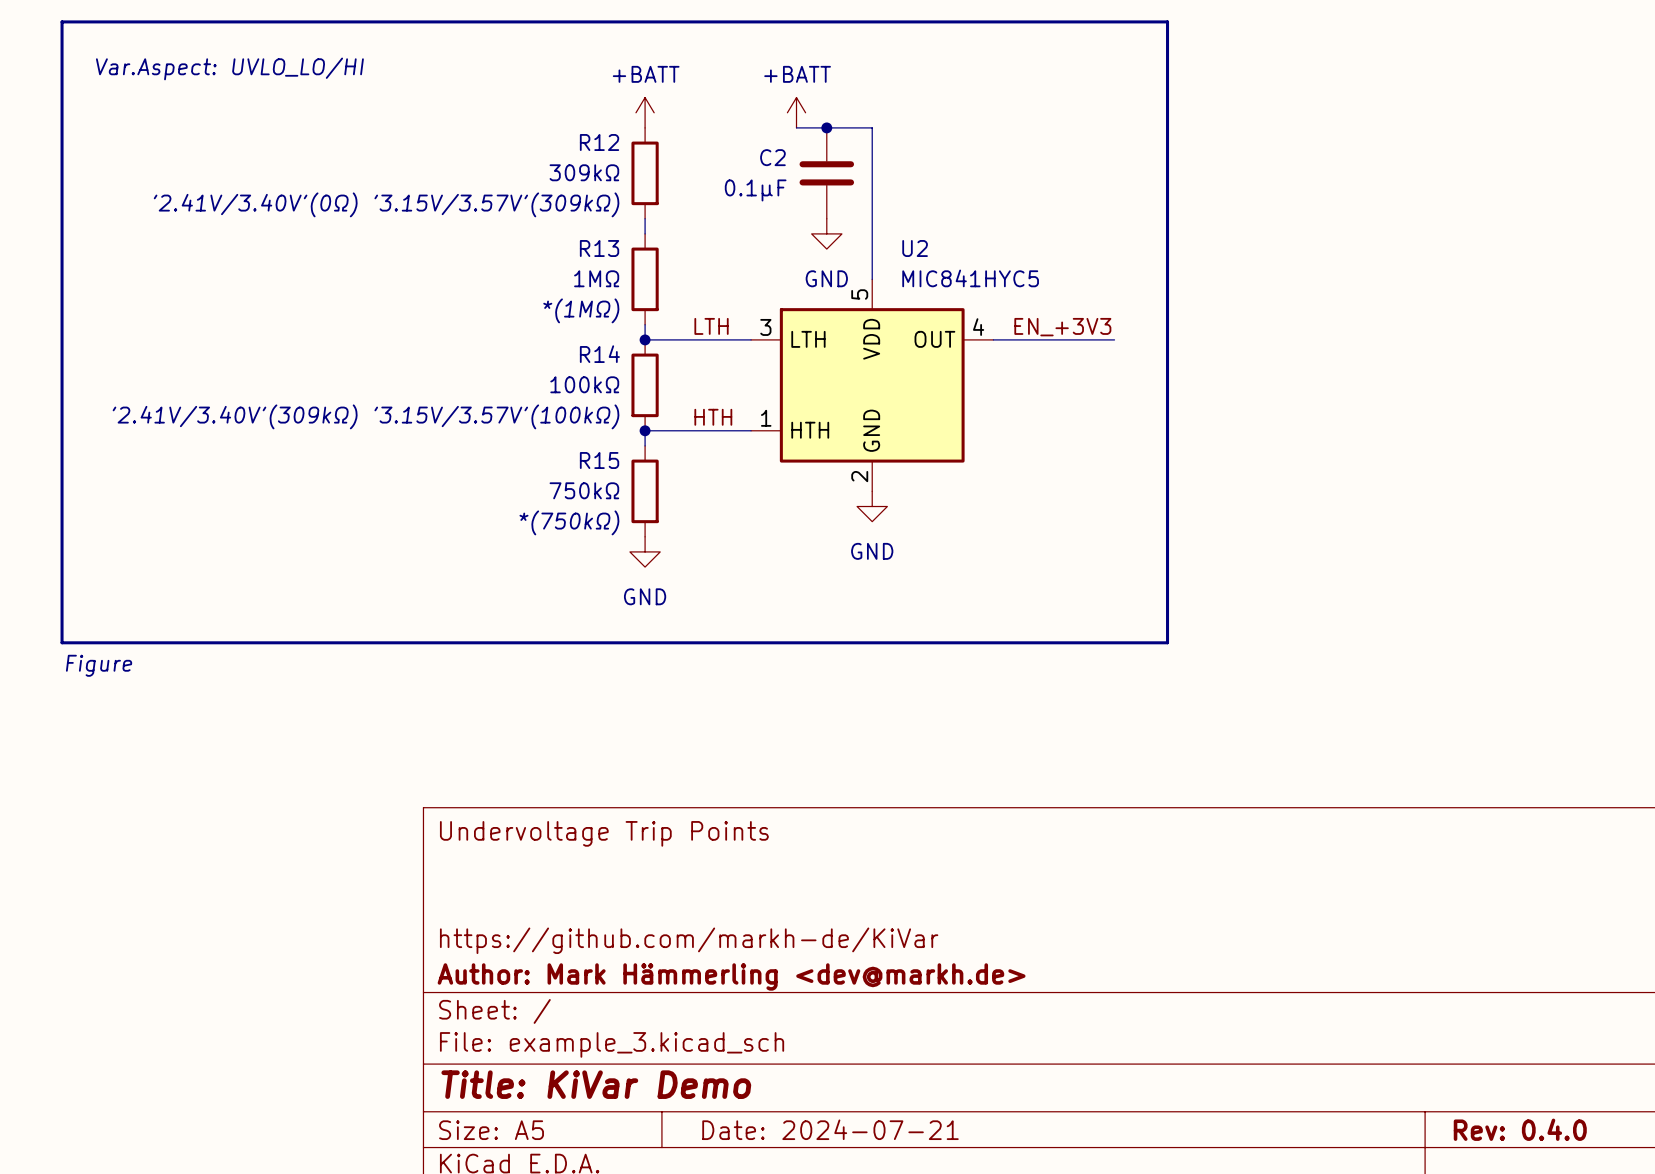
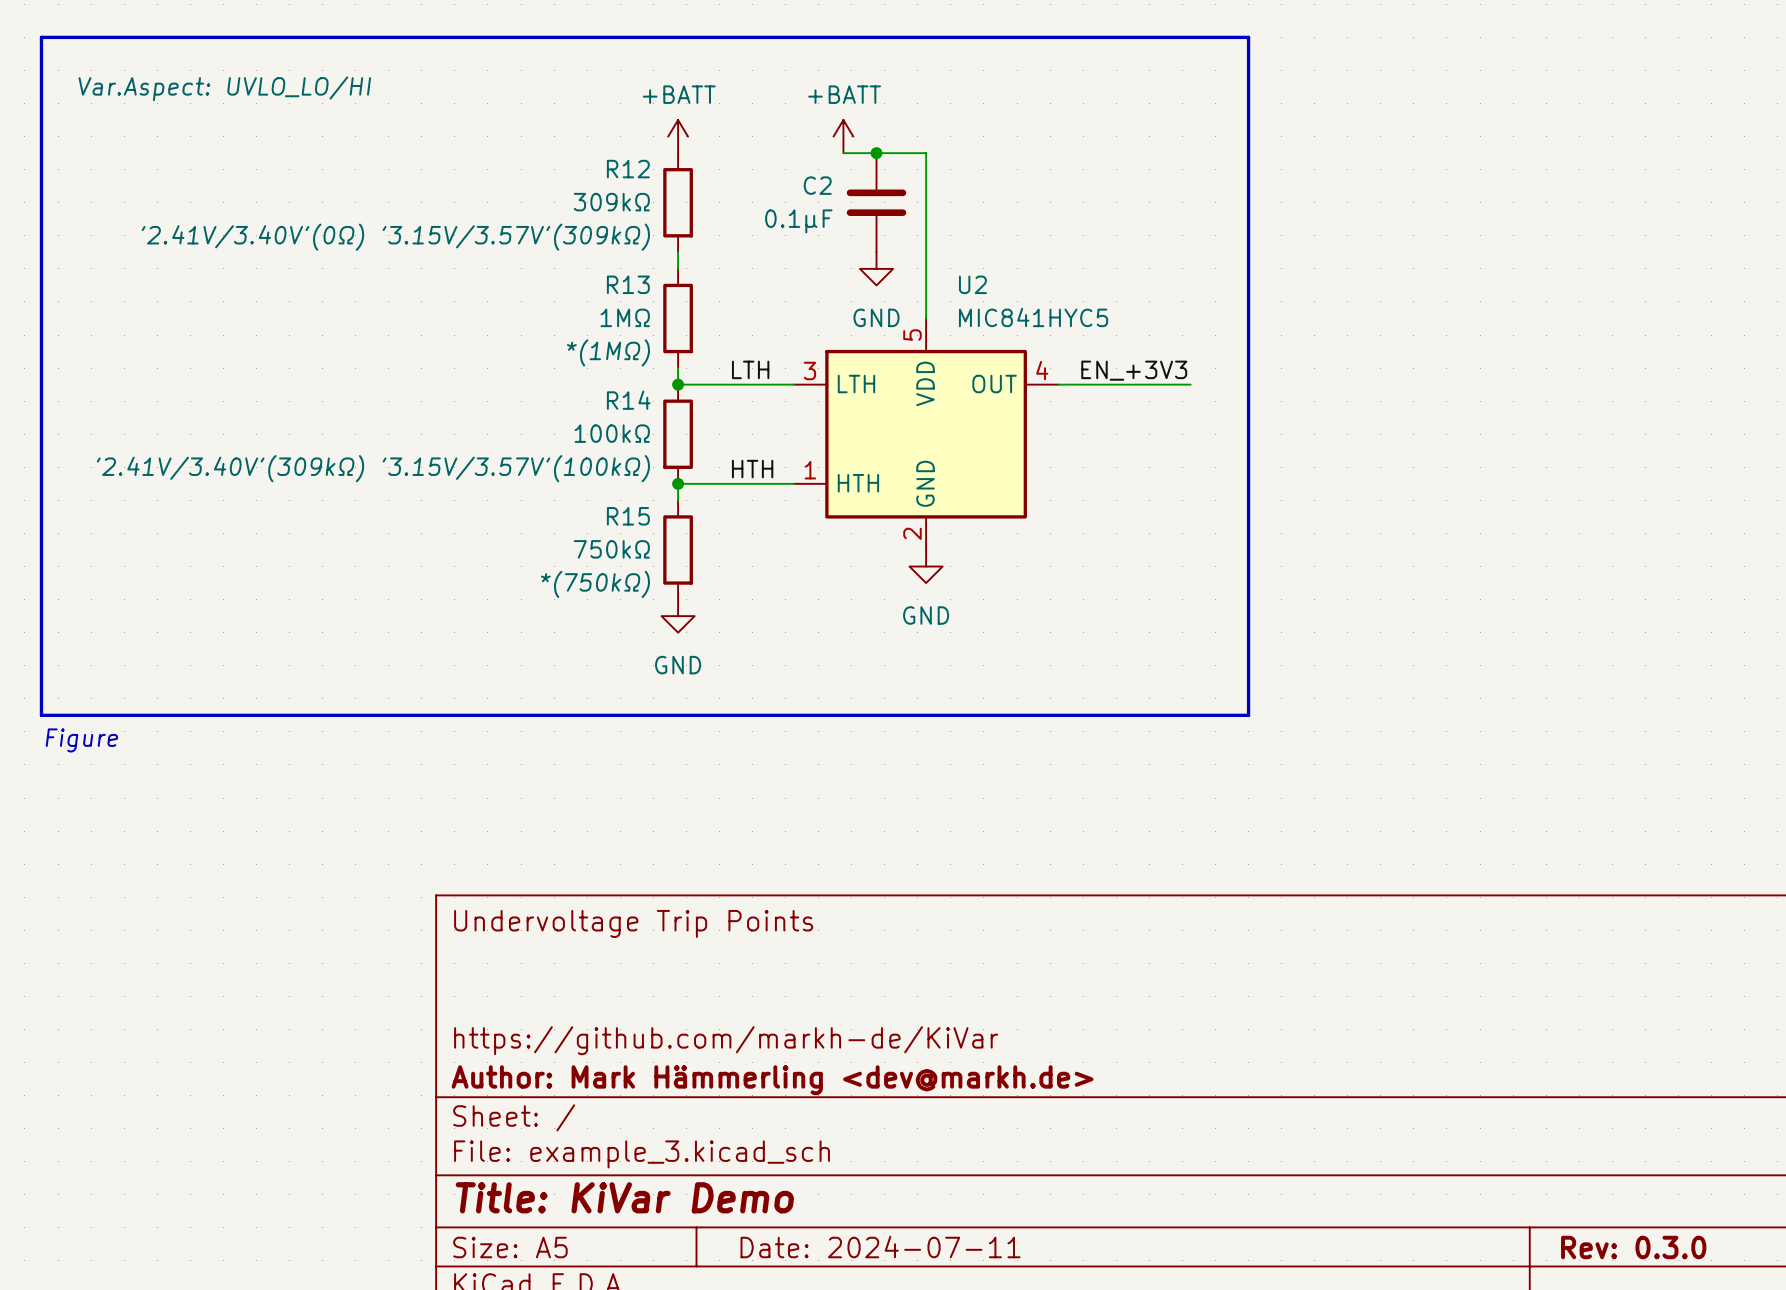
title block: Date: 2024-07-21 (830, 1129) -> Date: 2024-07-11 (880, 1247)
title block: Rev: 0.4.0 (1520, 1129) -> Rev: 0.3.0 (1633, 1247)

